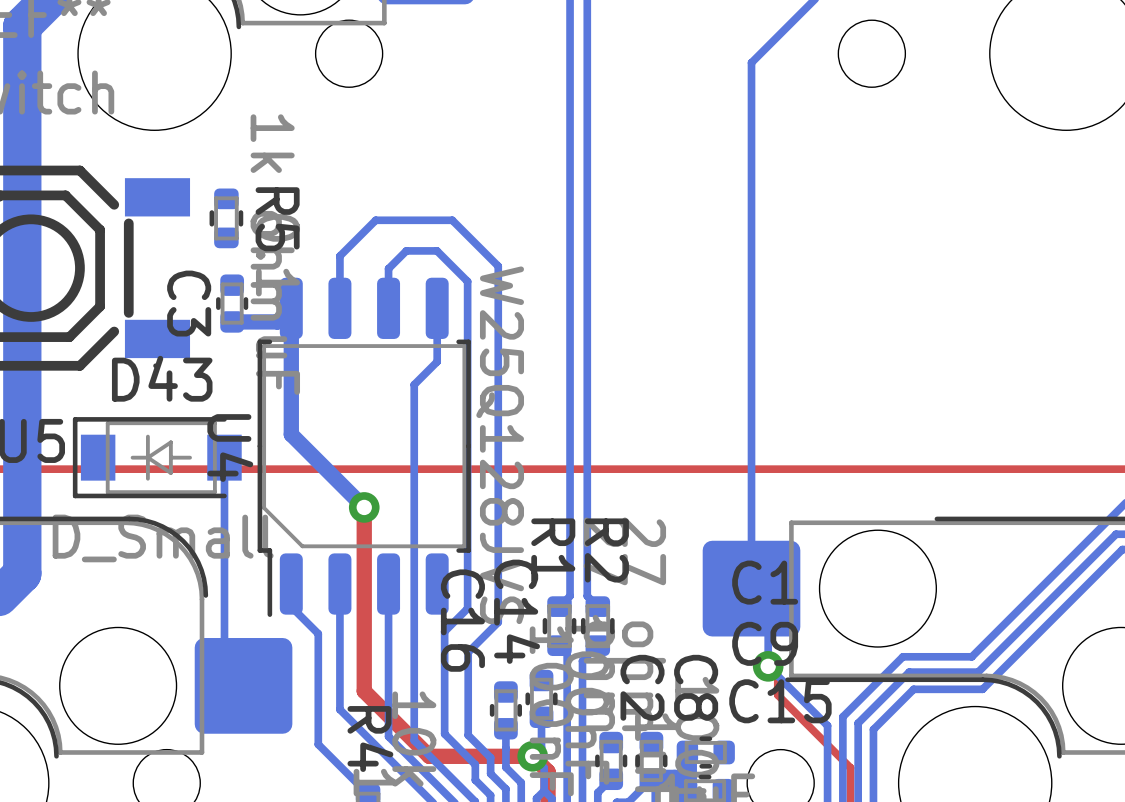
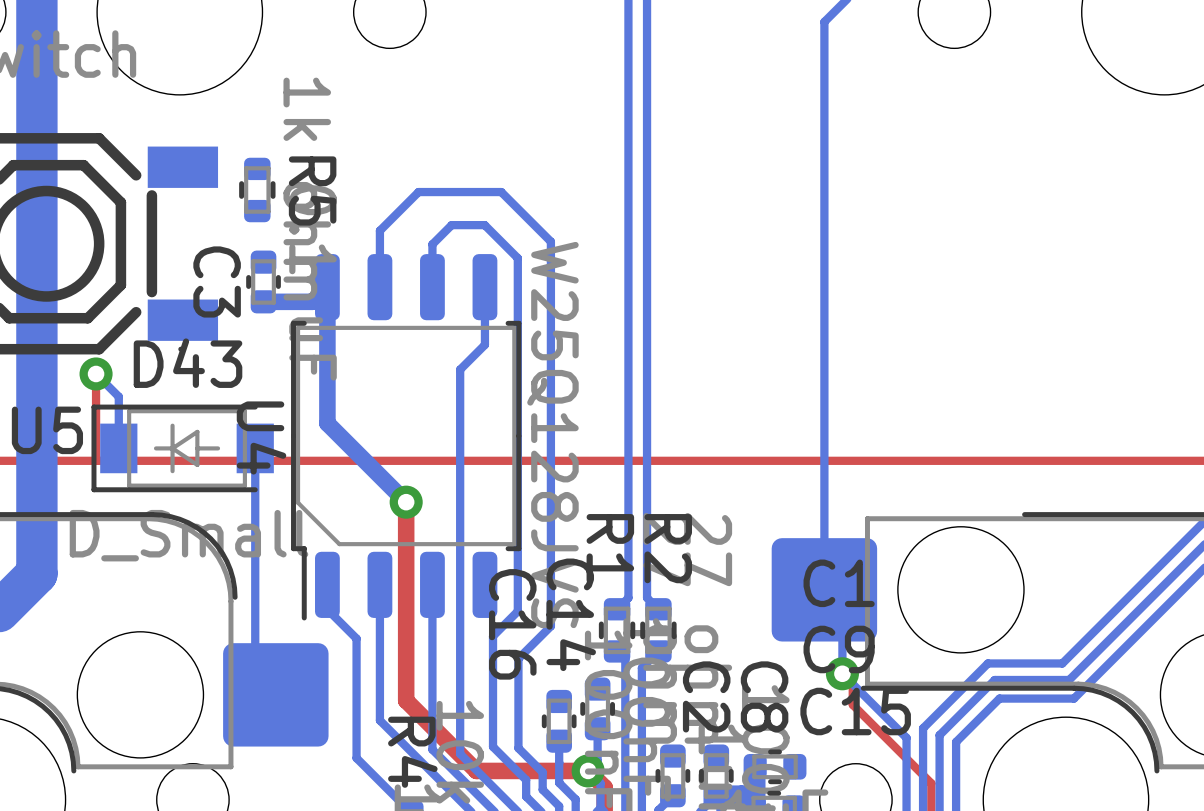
top track: none -> (96, 373) (96, 460)
bottom track: none -> (96, 373) (118, 396) (118, 448)
via: none -> (96, 373)

